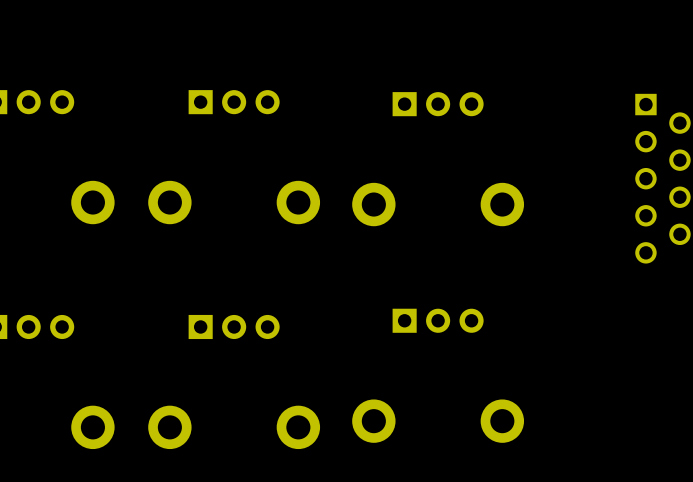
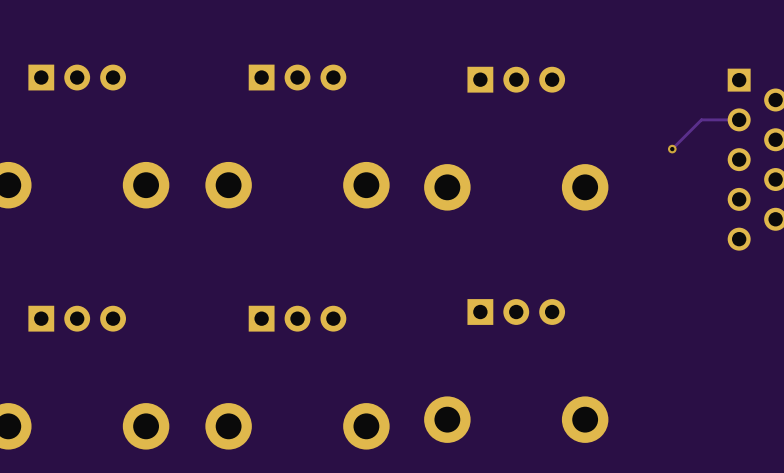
track: none -> (739, 119) (701, 119) (672, 149)
via: none -> (672, 149)

